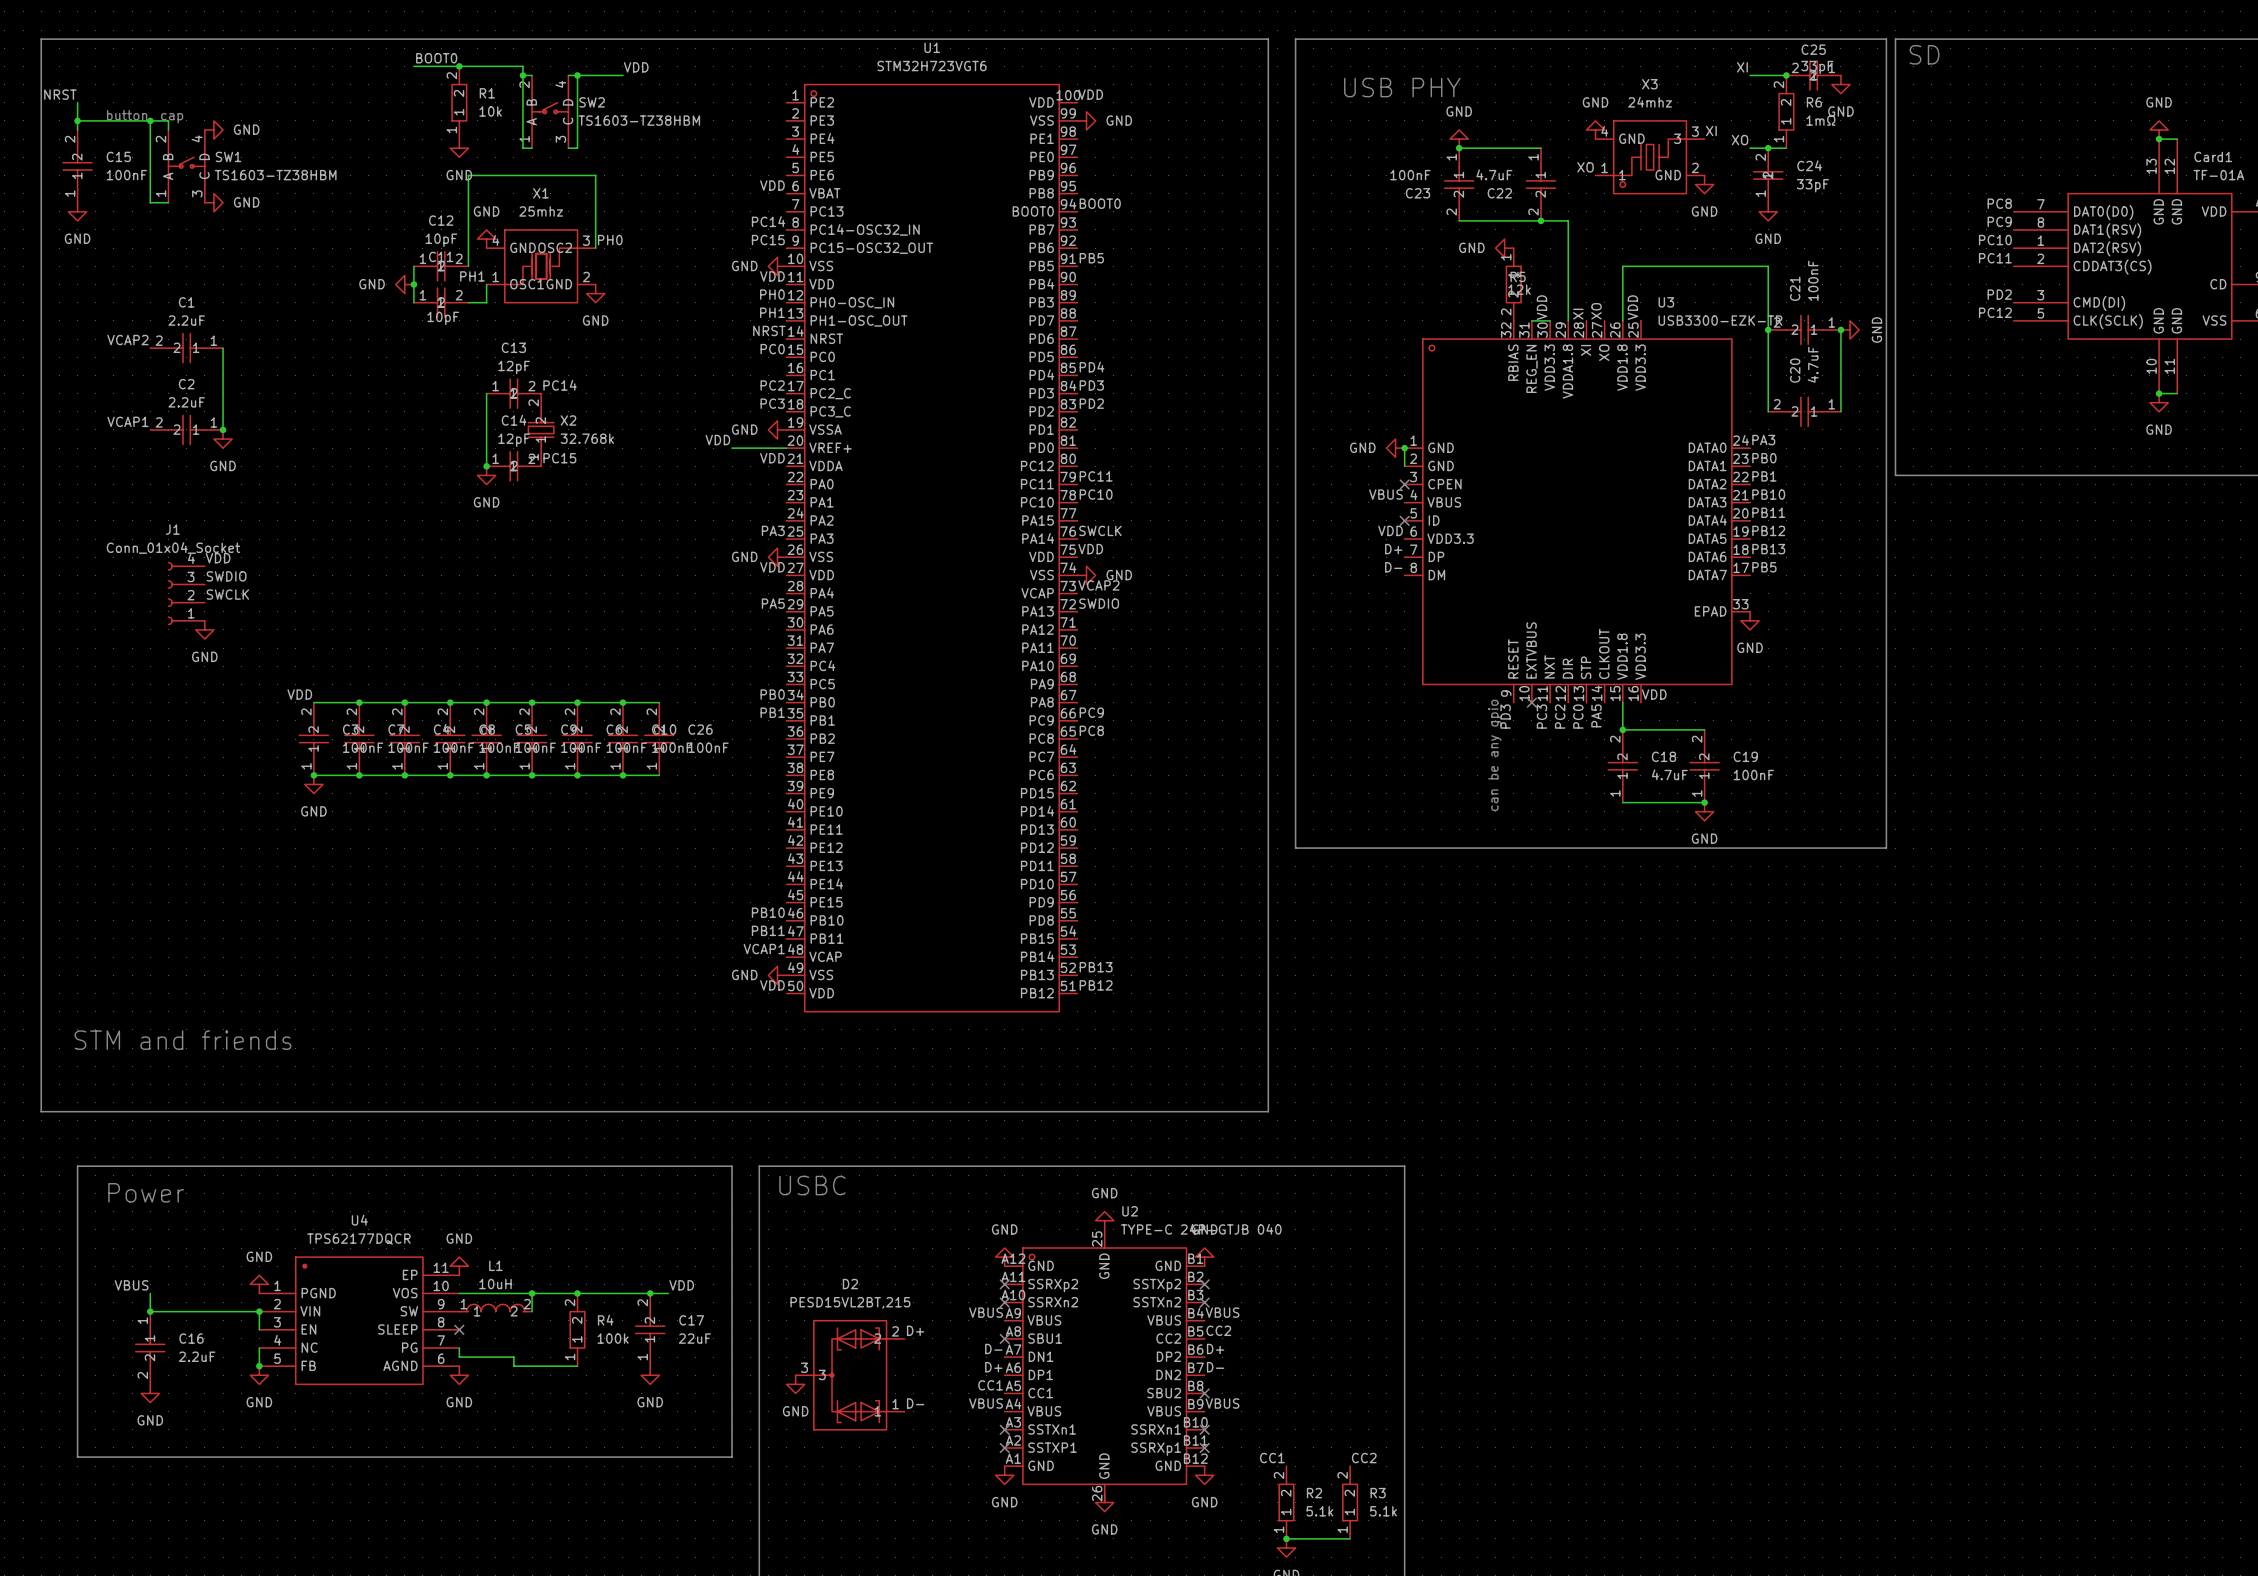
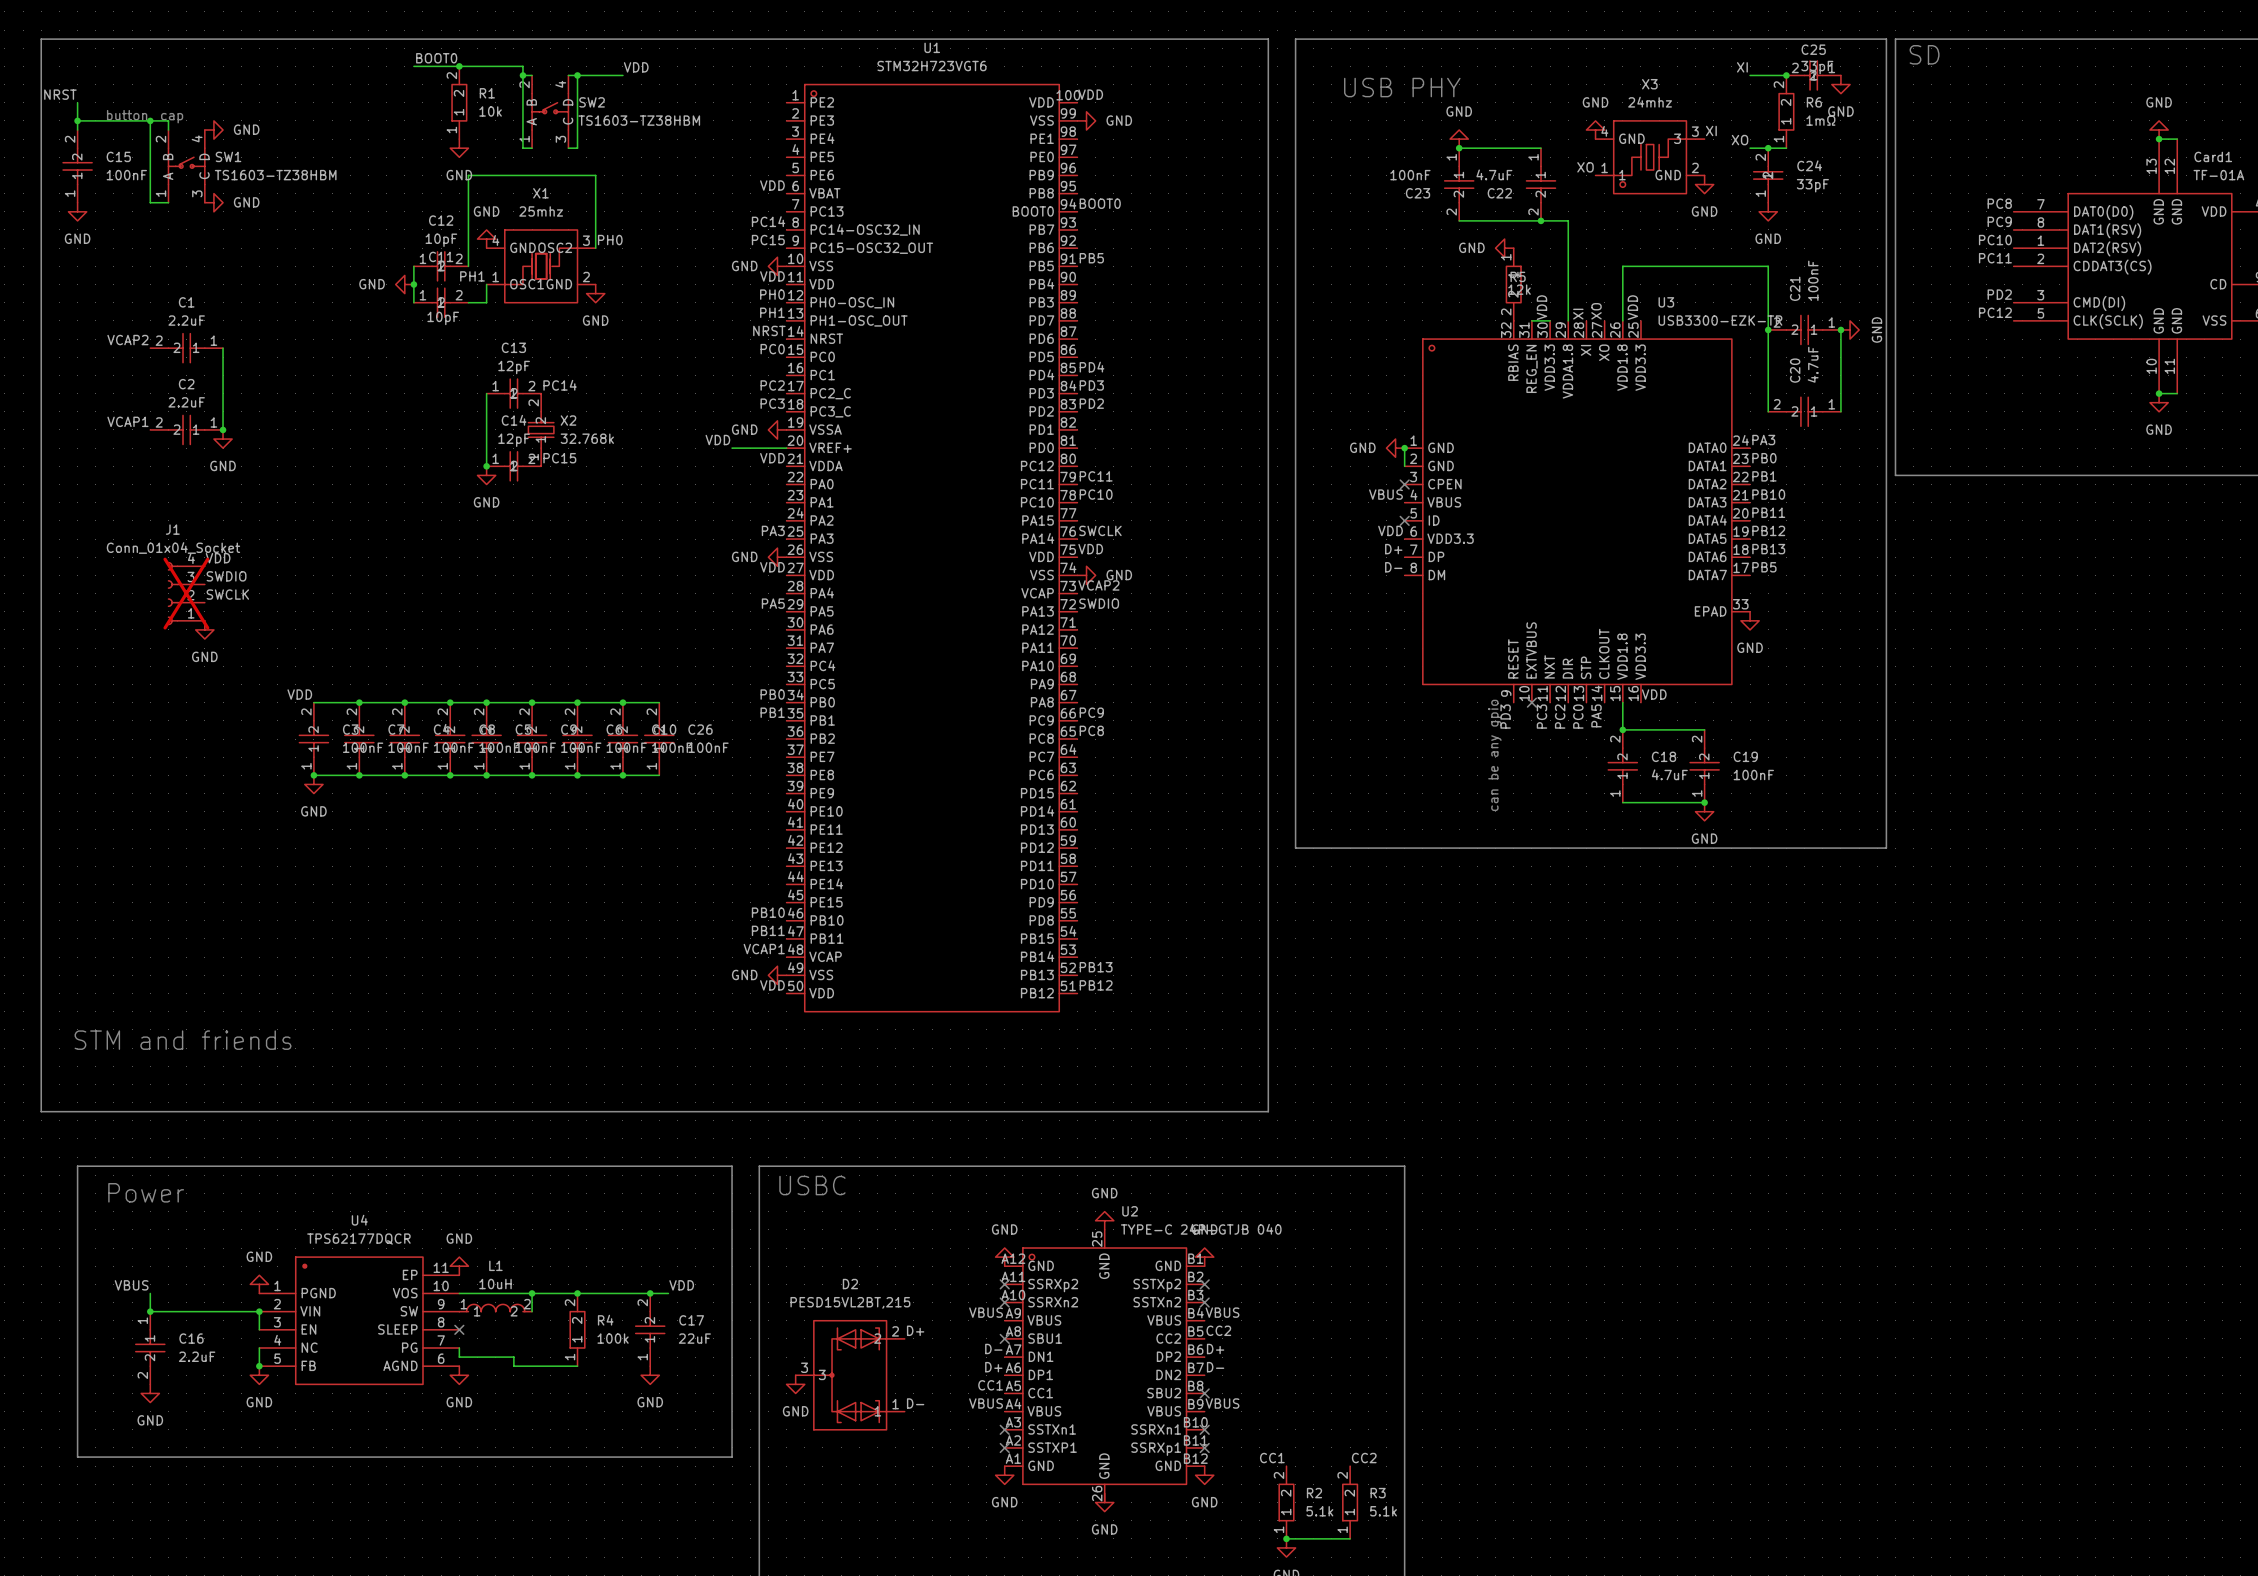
J1 do-not-place cross: none -> (186, 593)

